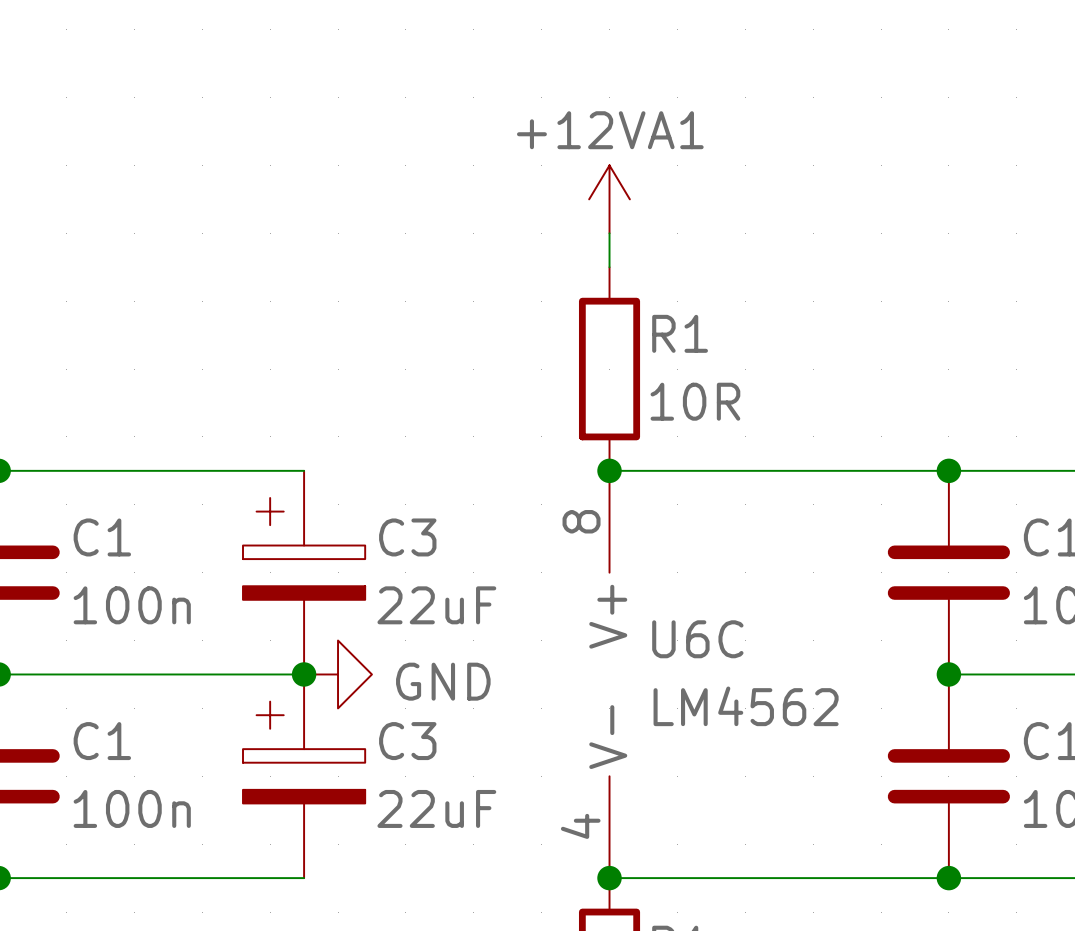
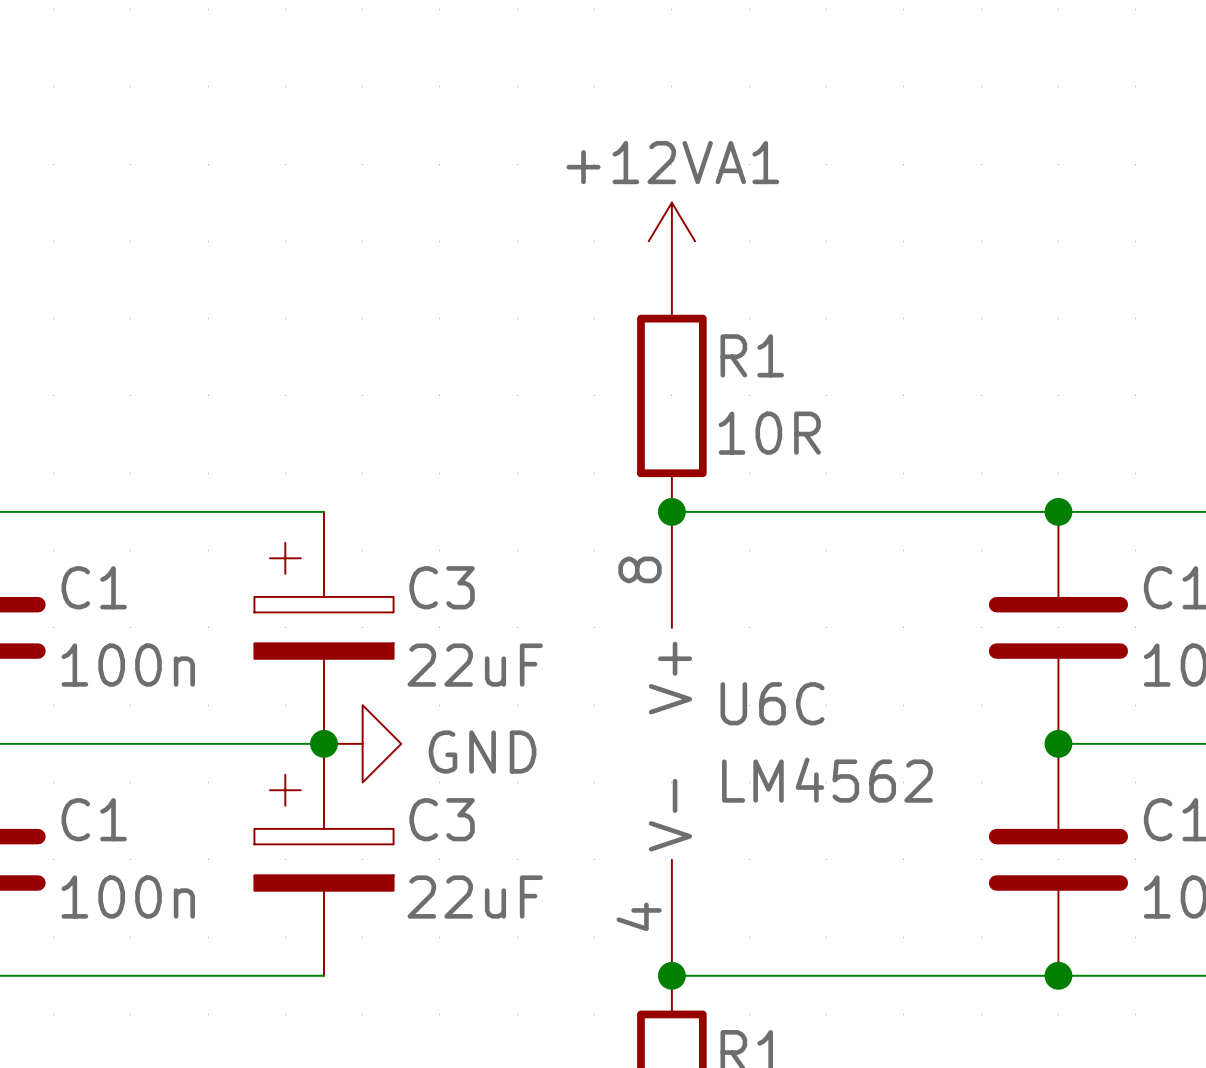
power symbol position: +12VA1 (609, 199) -> +12VA1 (671, 241)

